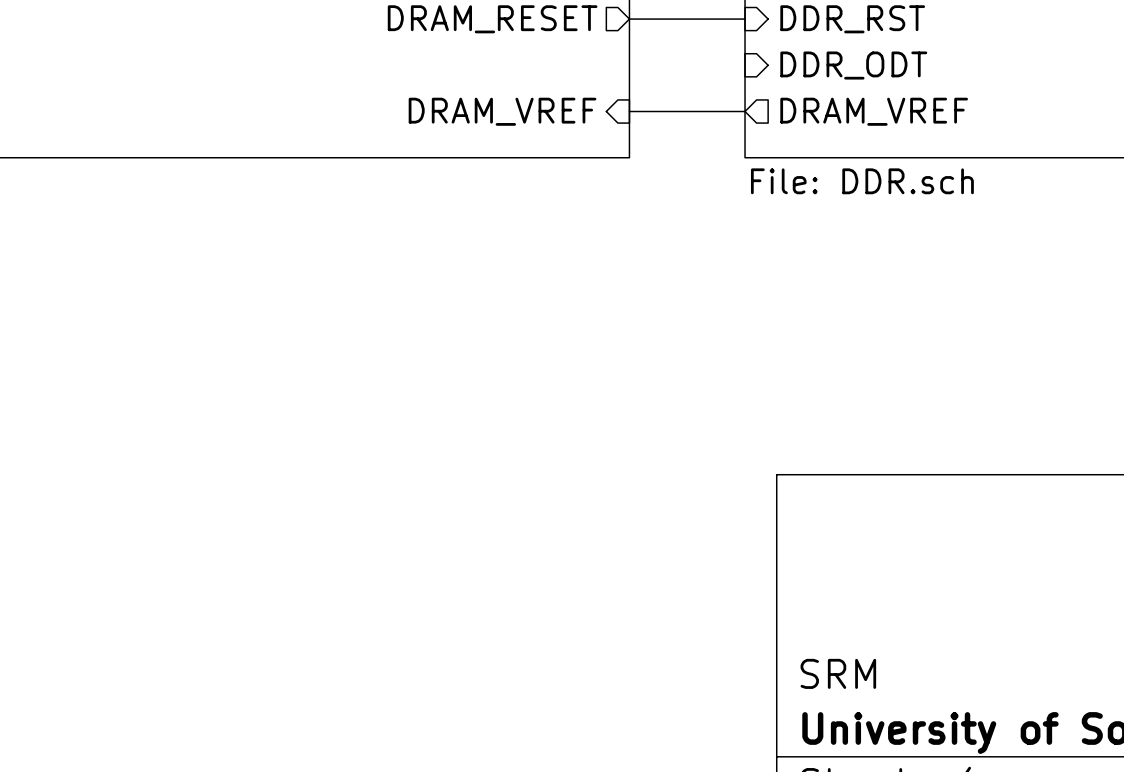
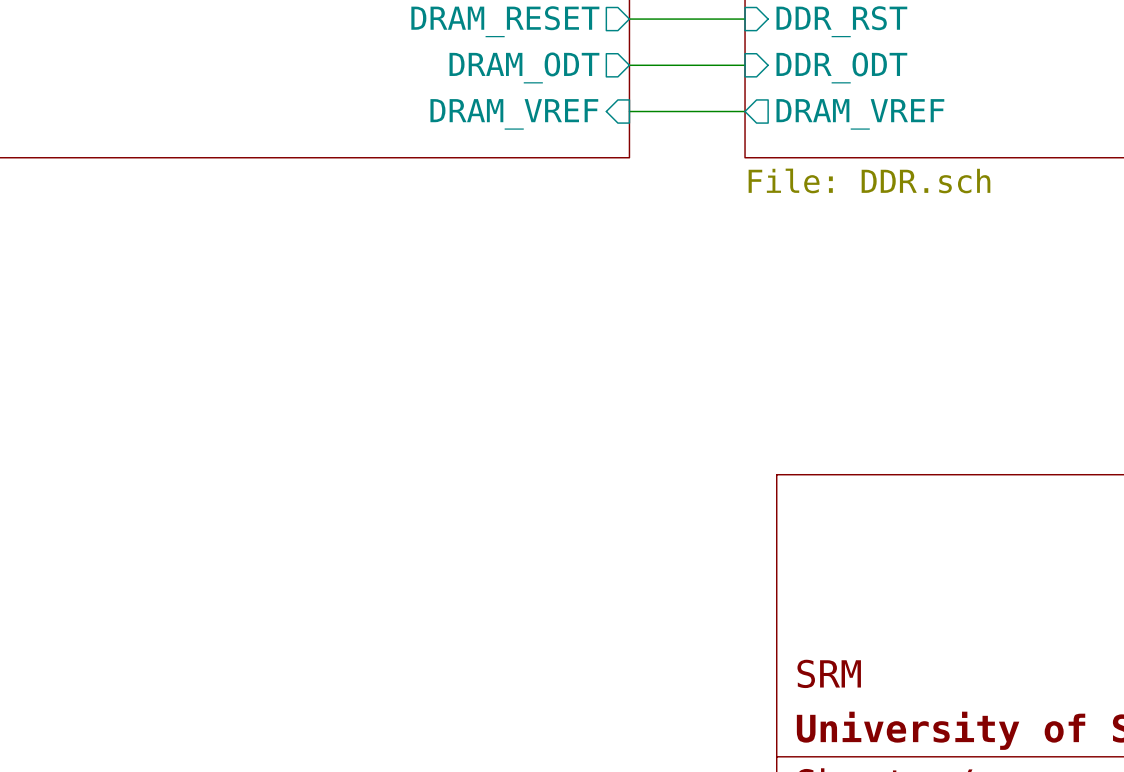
sheet pin: none -> DRAM_ODT (524, 67)
wire: none -> (629, 65) (745, 65)

